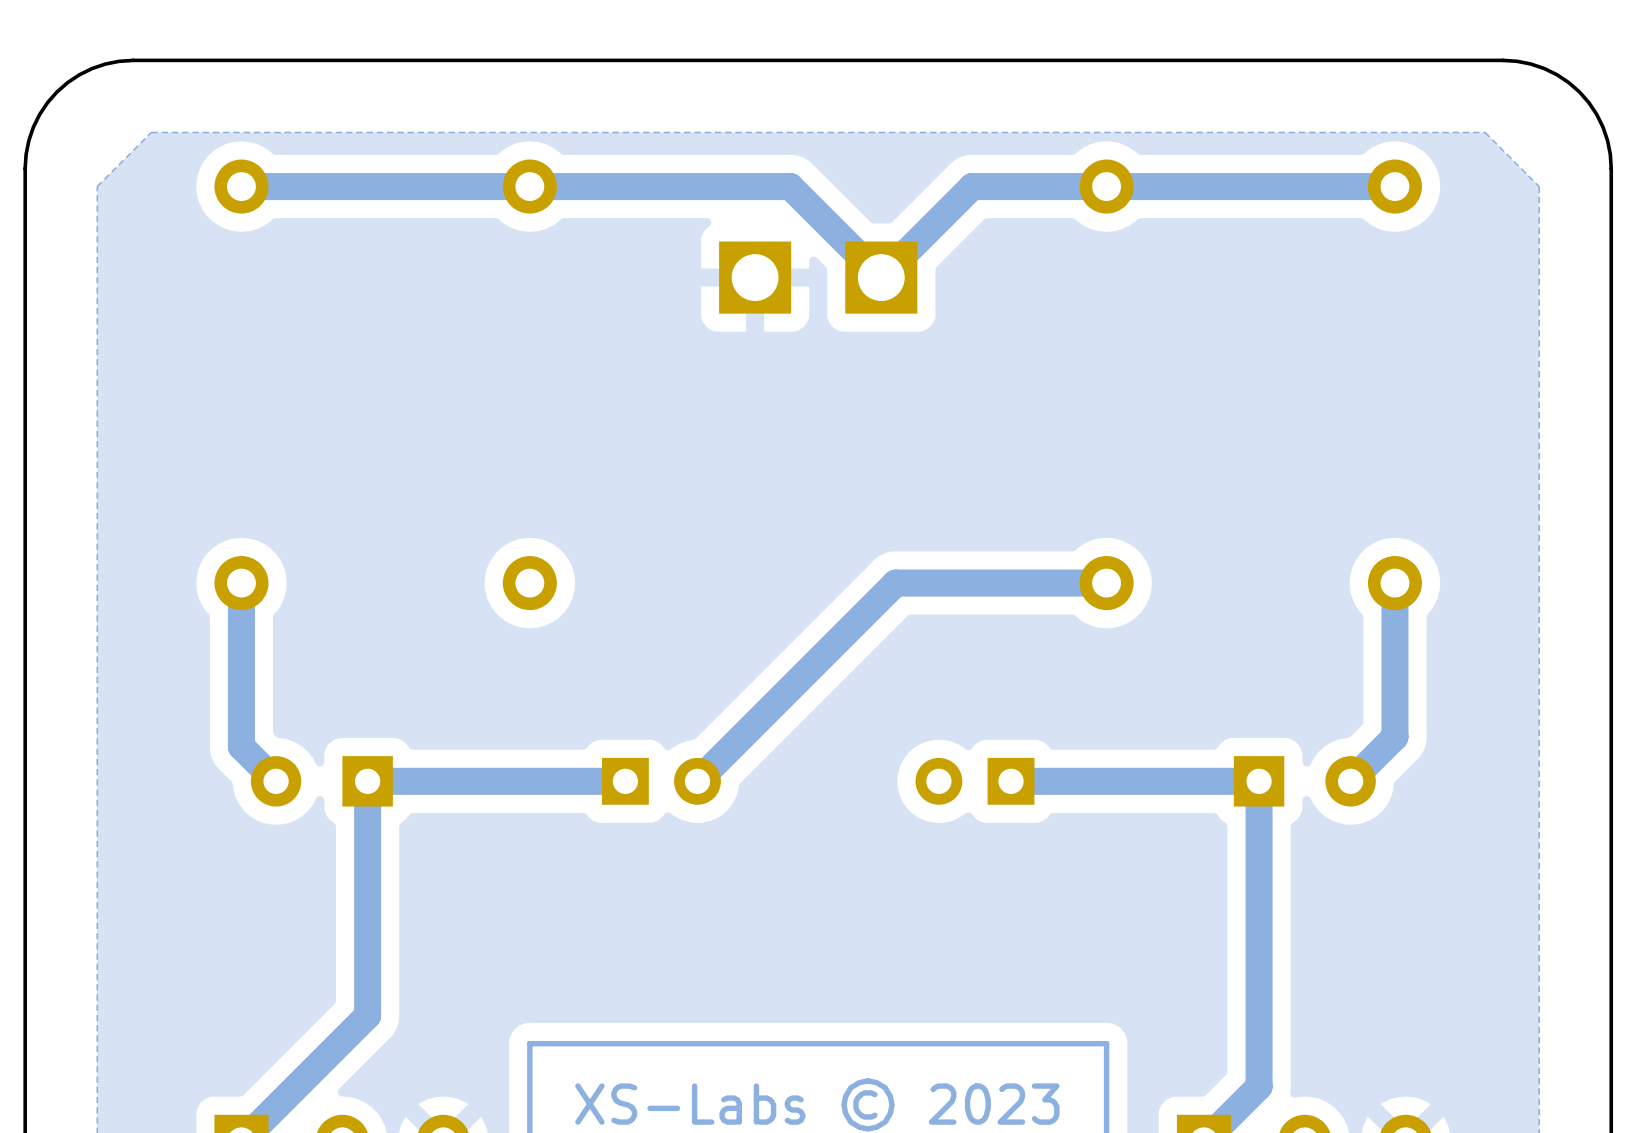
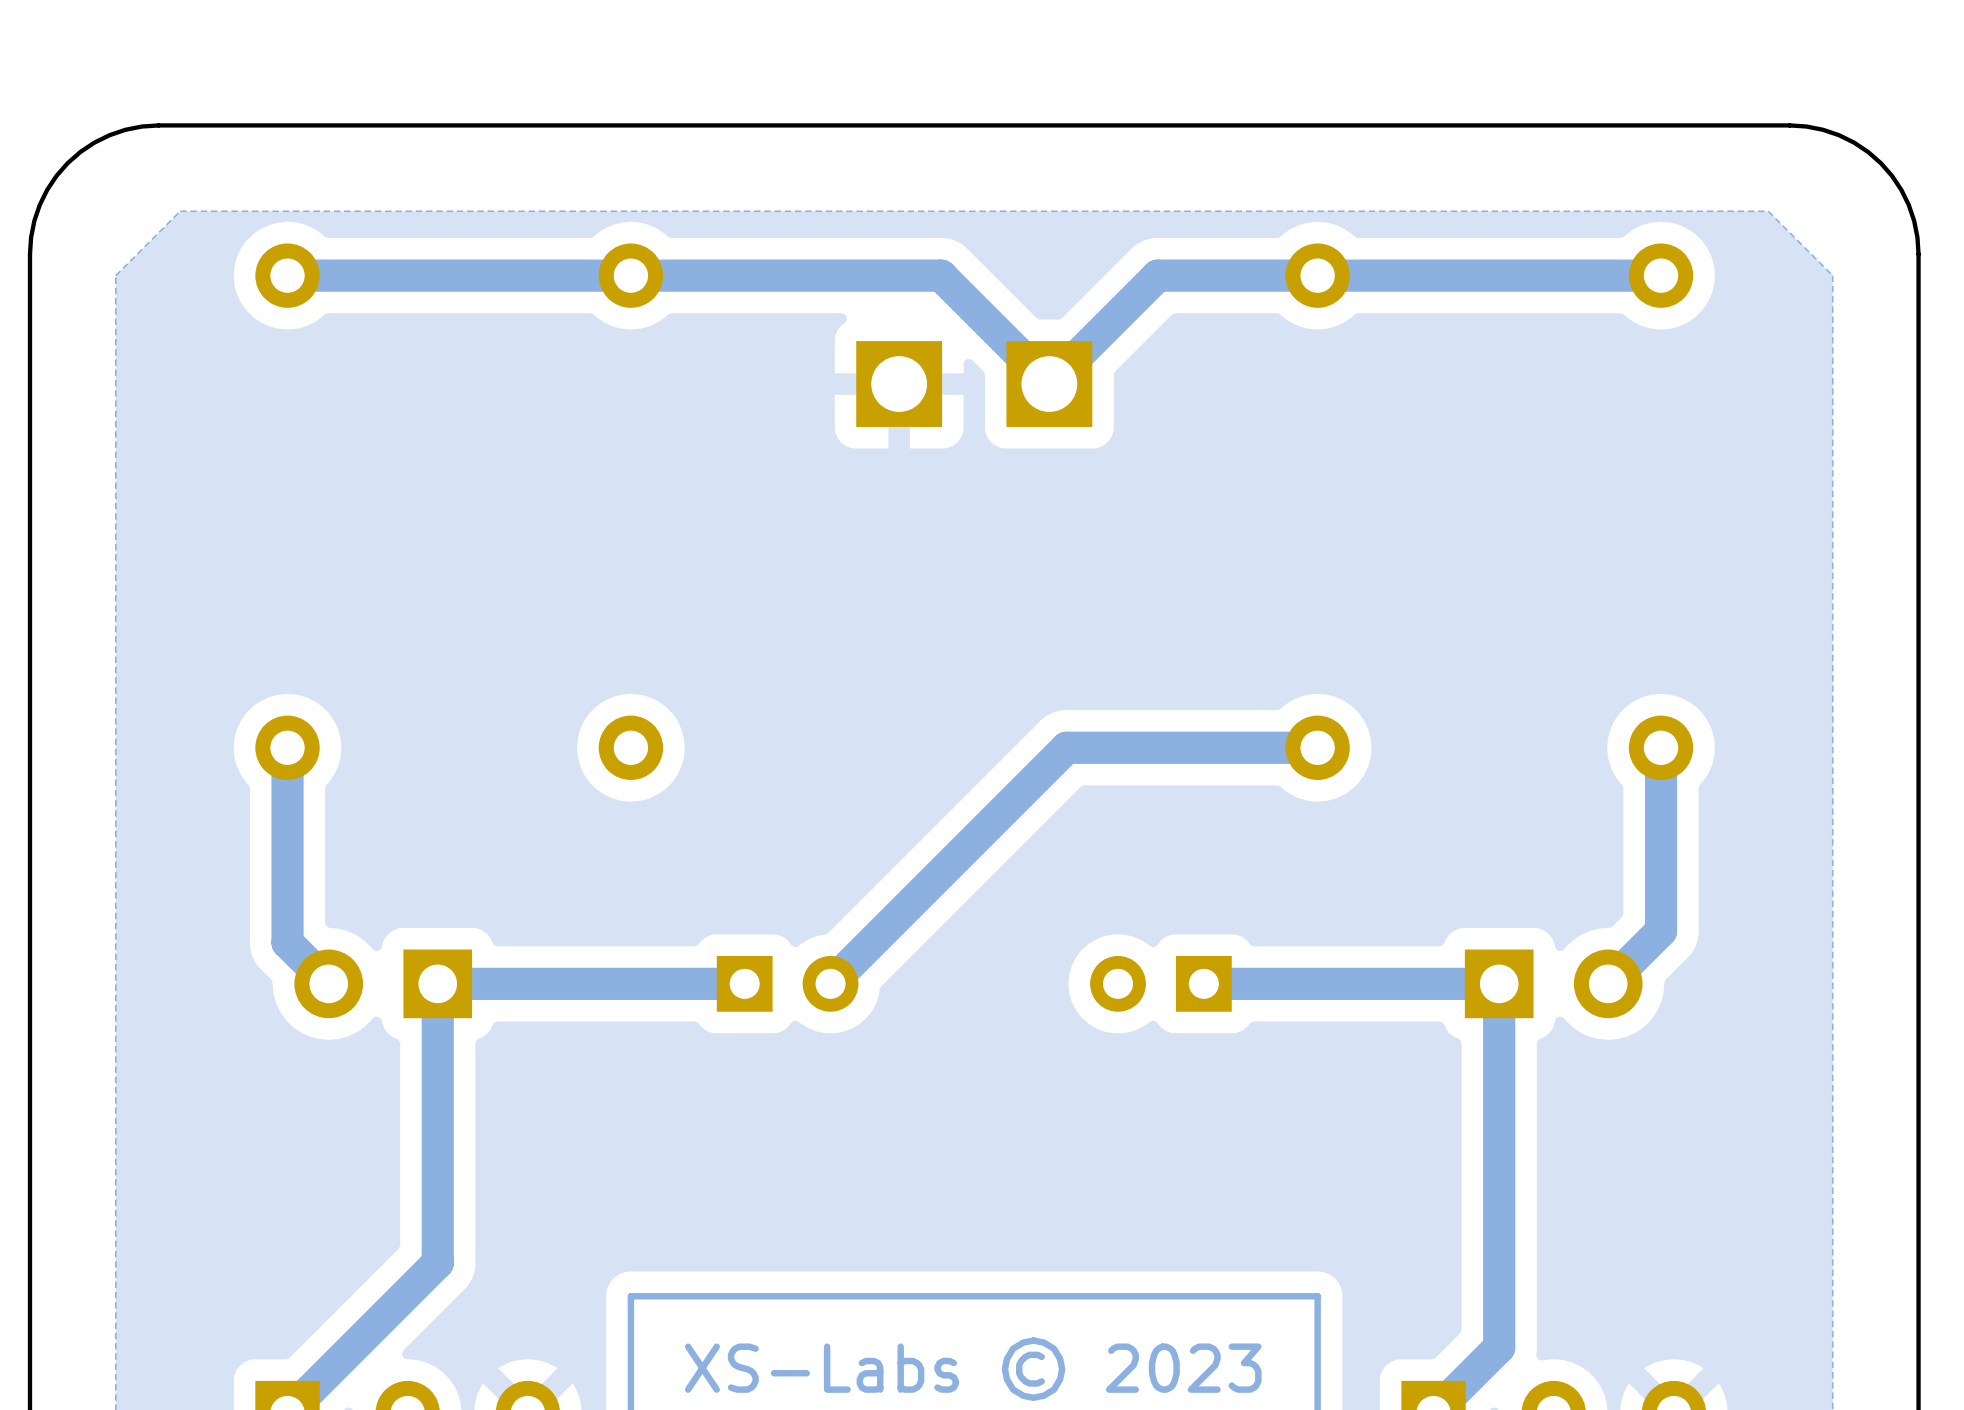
part footprint: [250, 756, 393, 807] -> [294, 949, 473, 1019]
part footprint: [1233, 756, 1376, 807] -> [1464, 949, 1643, 1019]

